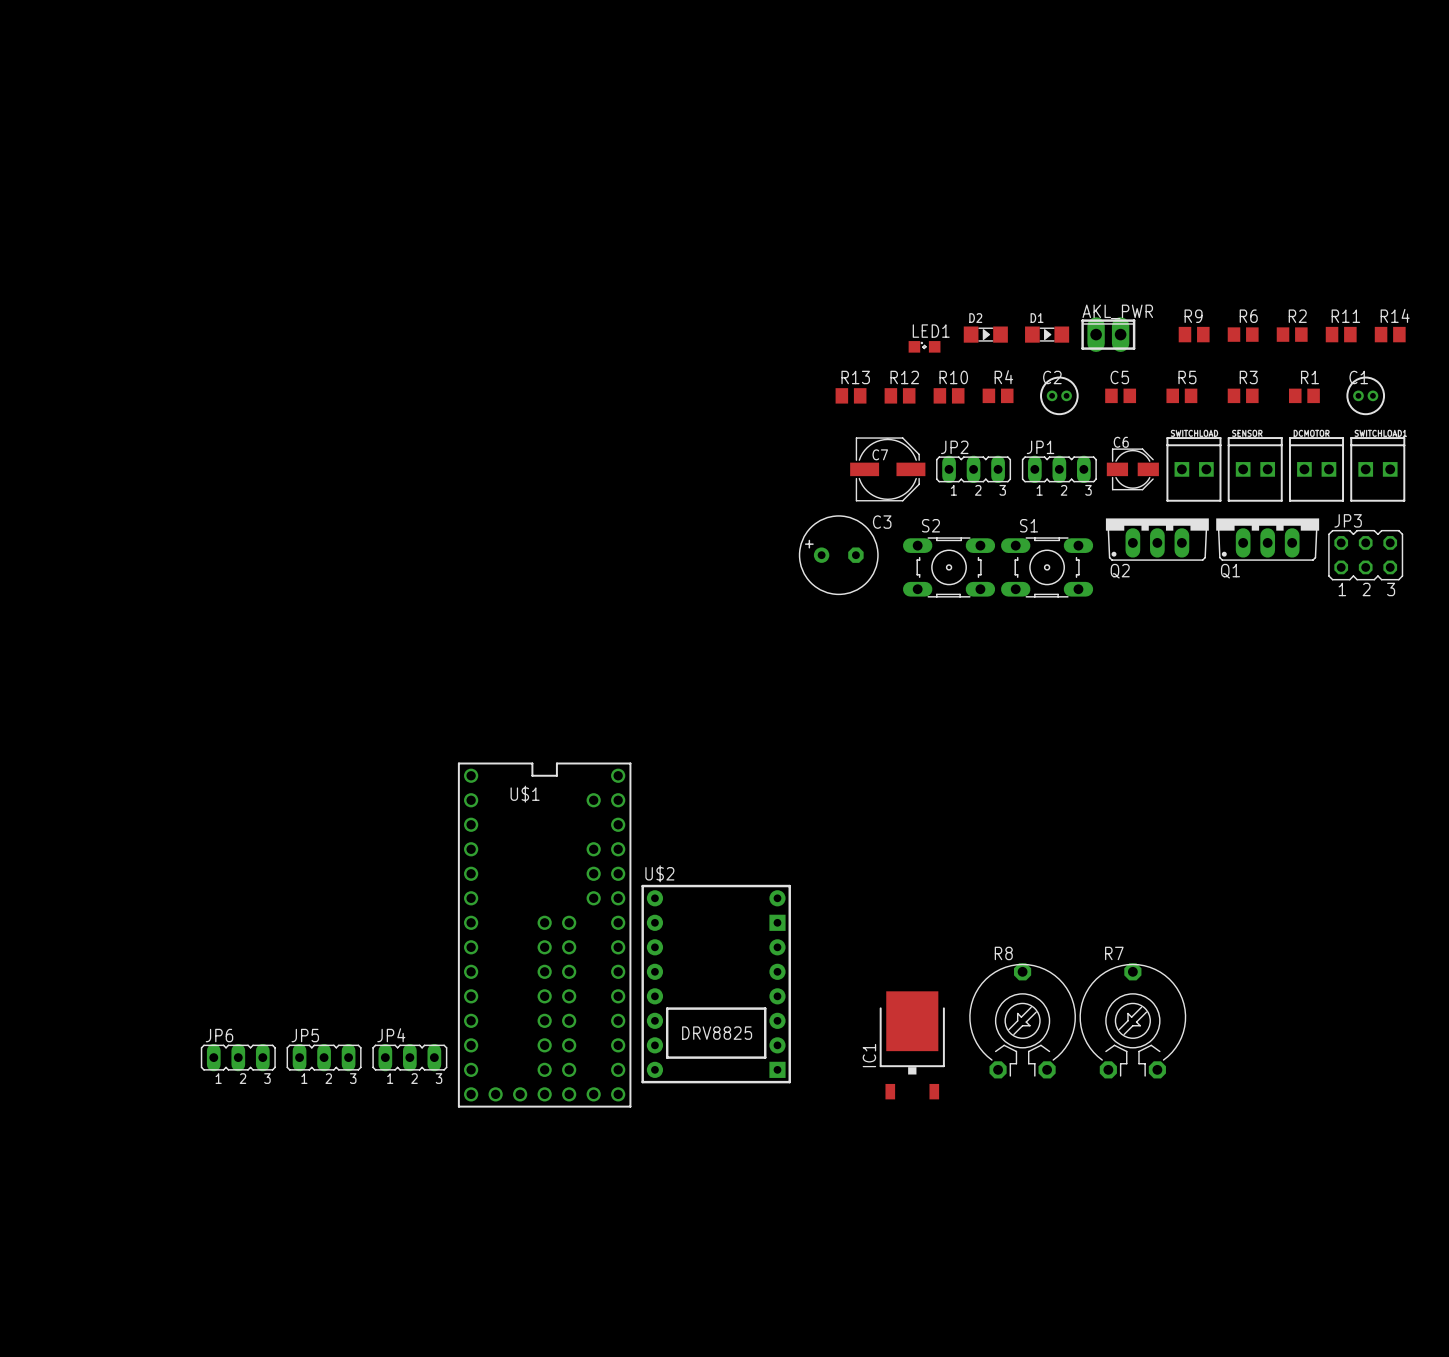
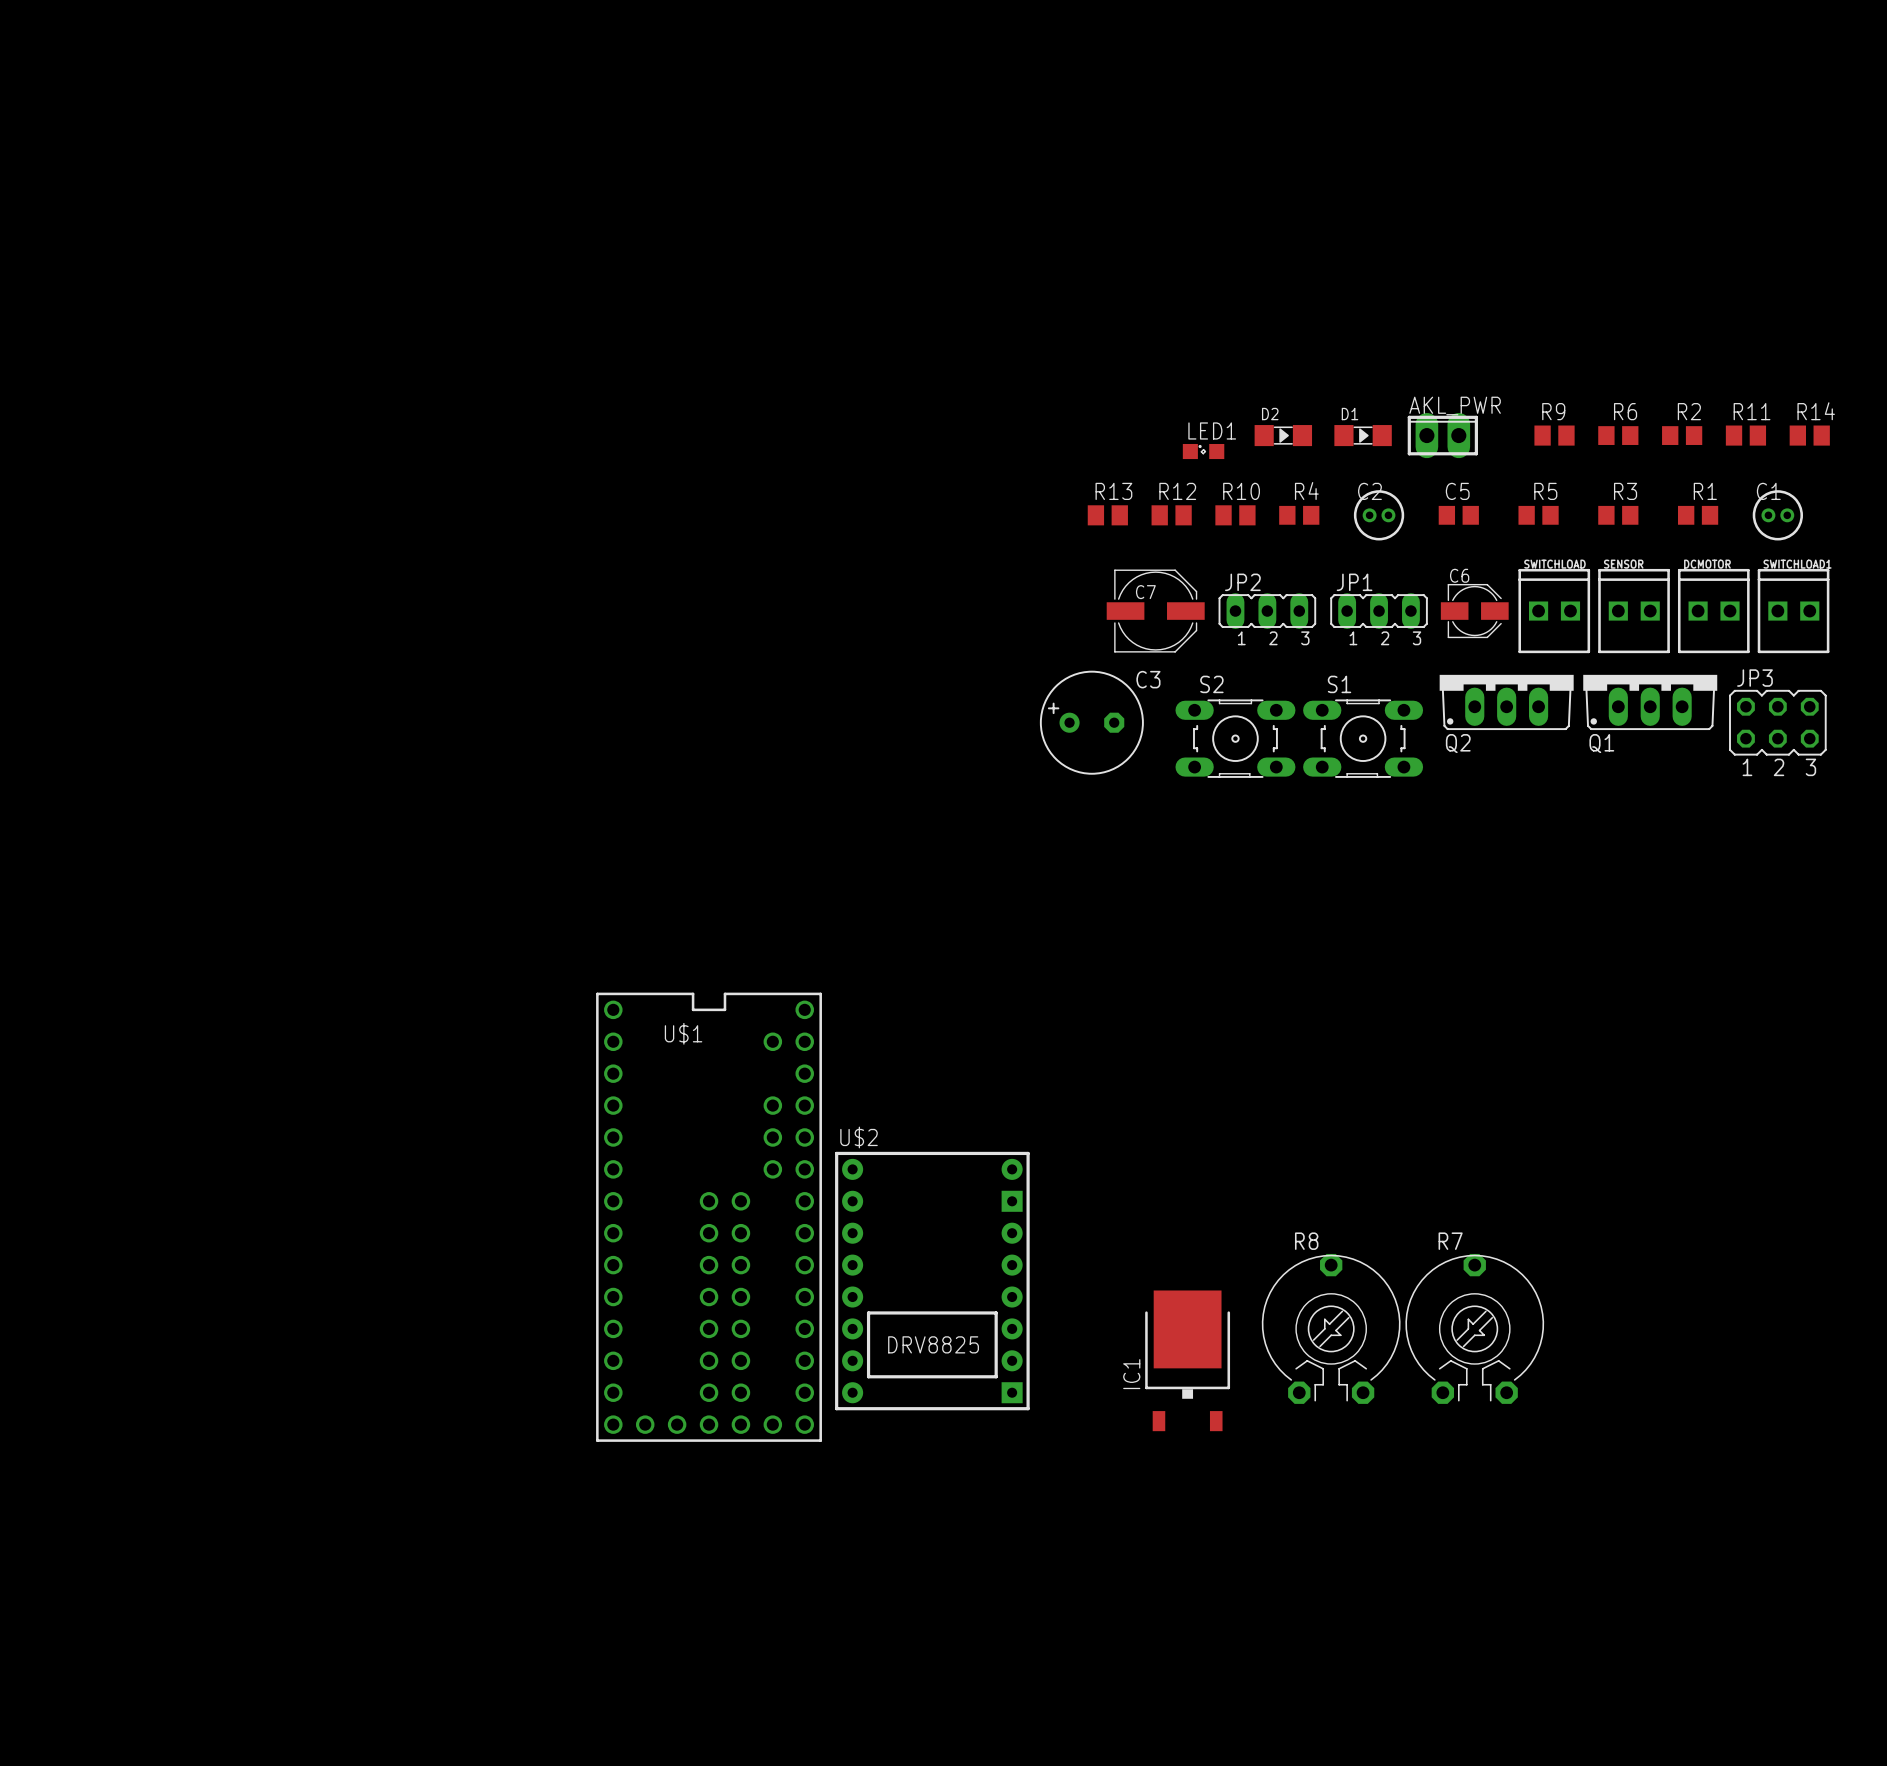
JP6: (238, 1057) -> none
JP5: (324, 1057) -> none
JP4: (409, 1057) -> none

